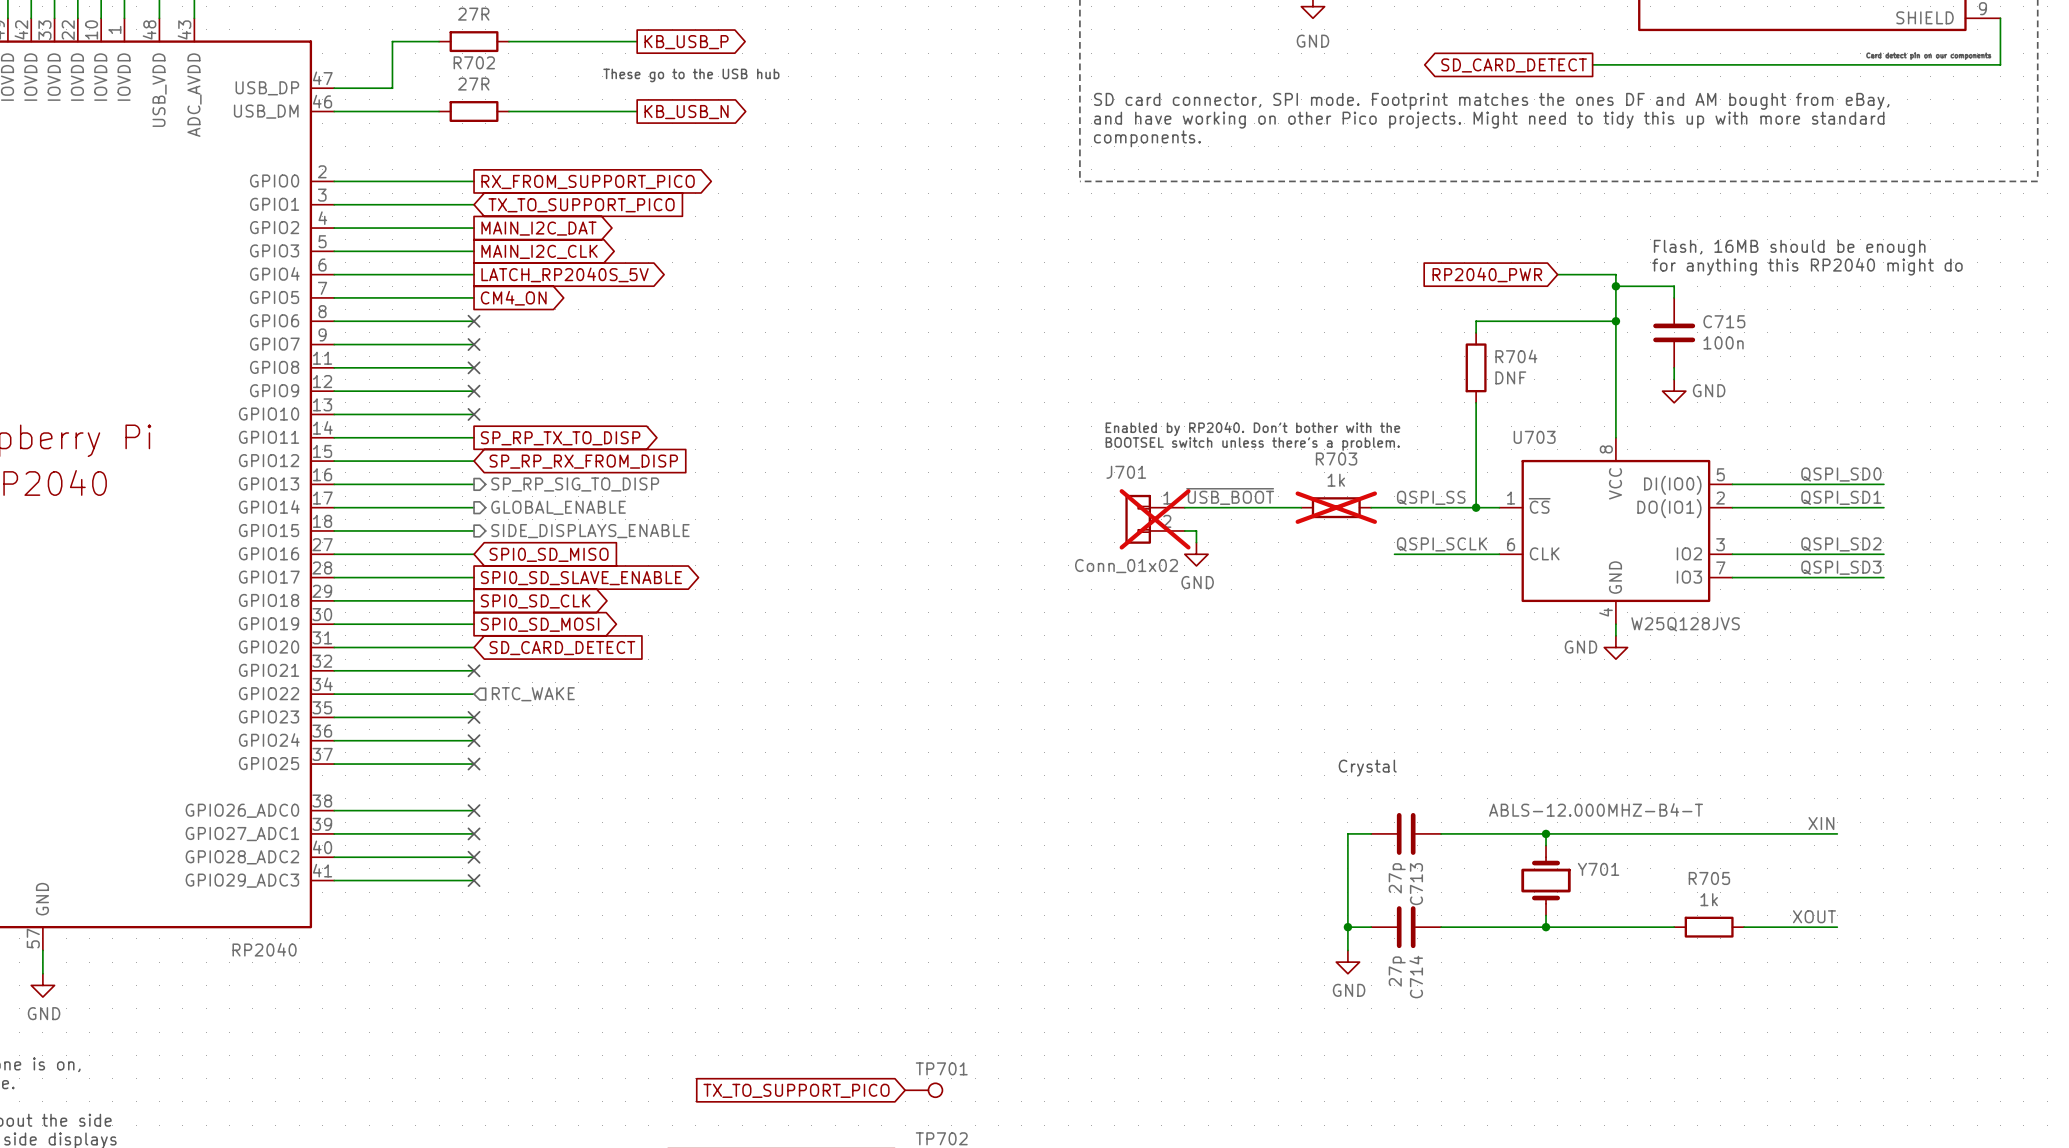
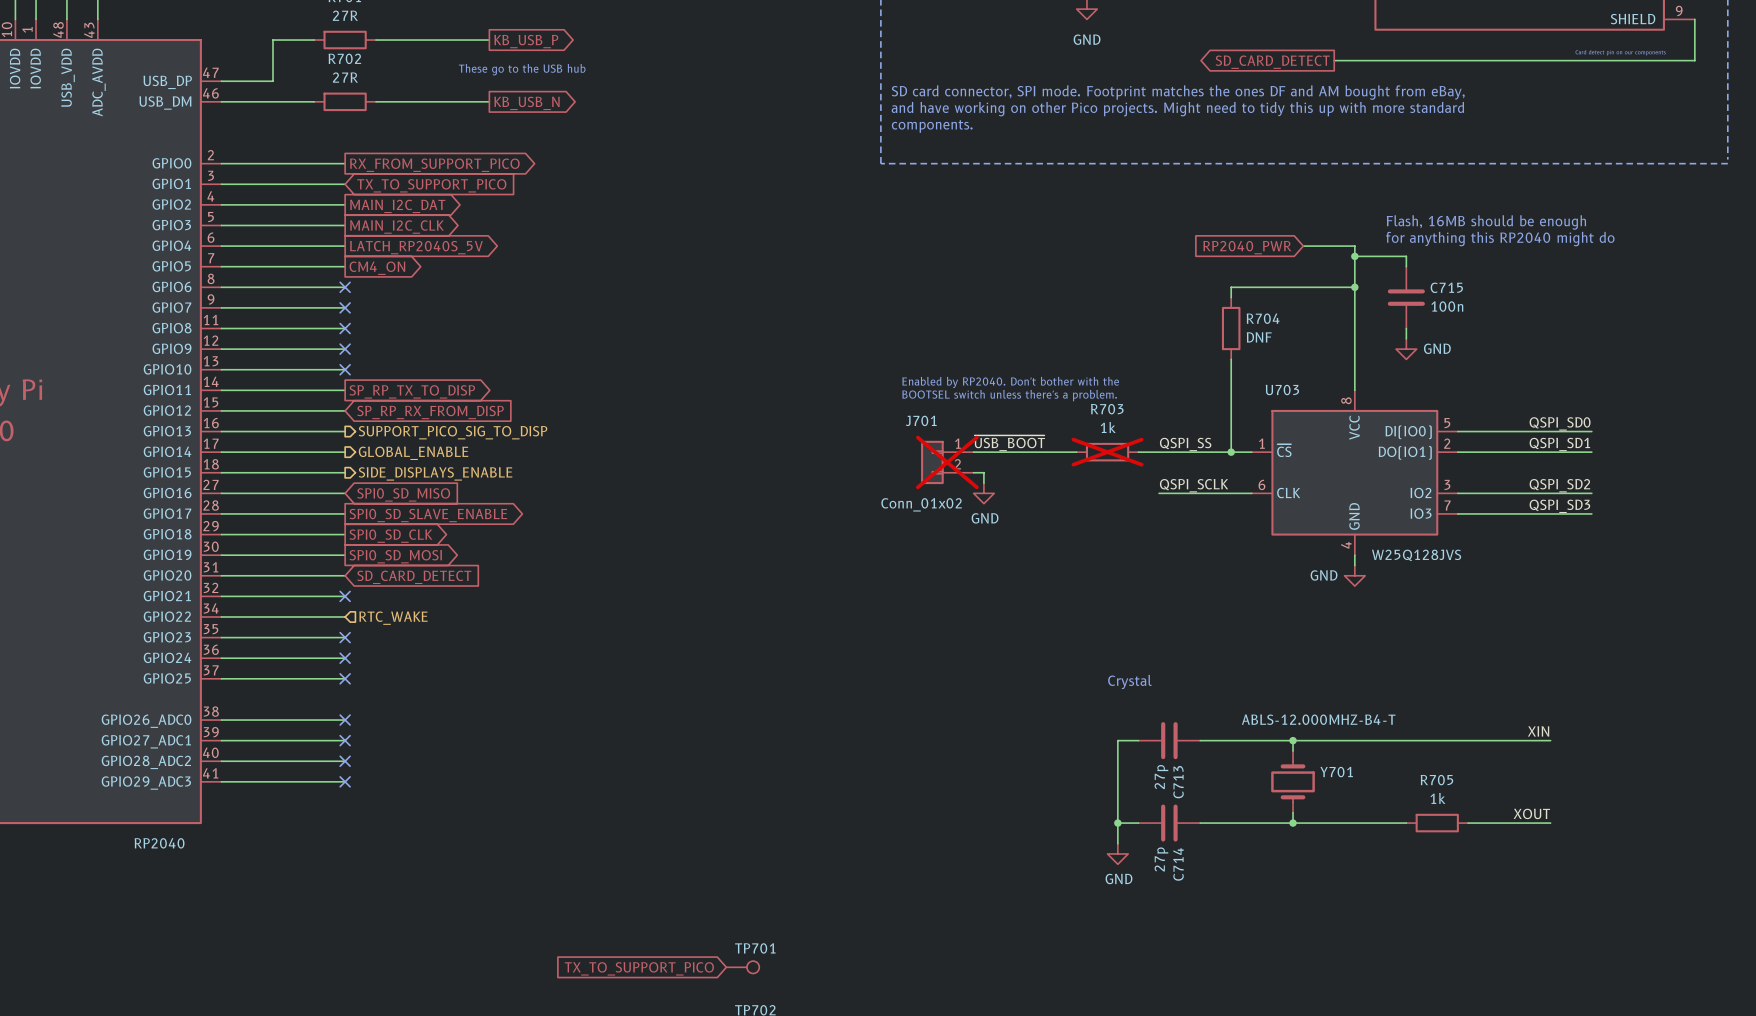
hierarchical label: SP_RP_SIG_TO_DISP (575, 484) -> SUPPORT_PICO_SIG_TO_DISP (453, 432)

